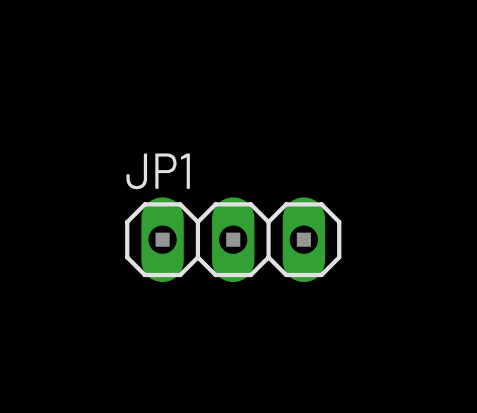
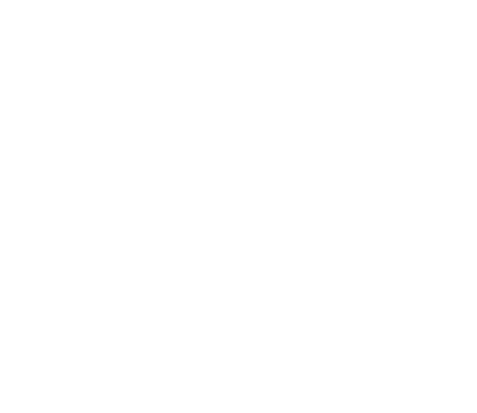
JP1: (233, 239) -> none

